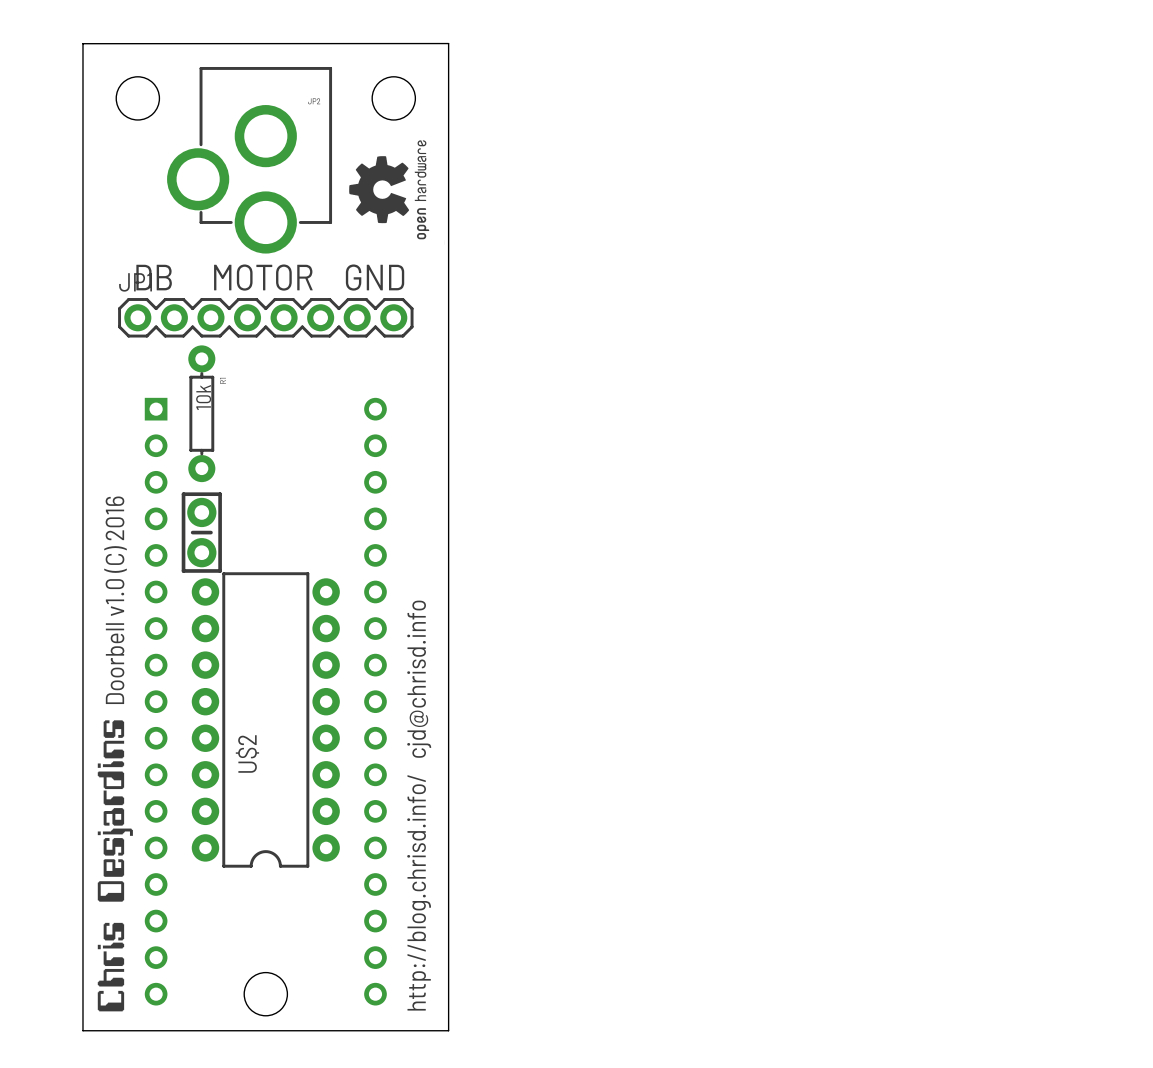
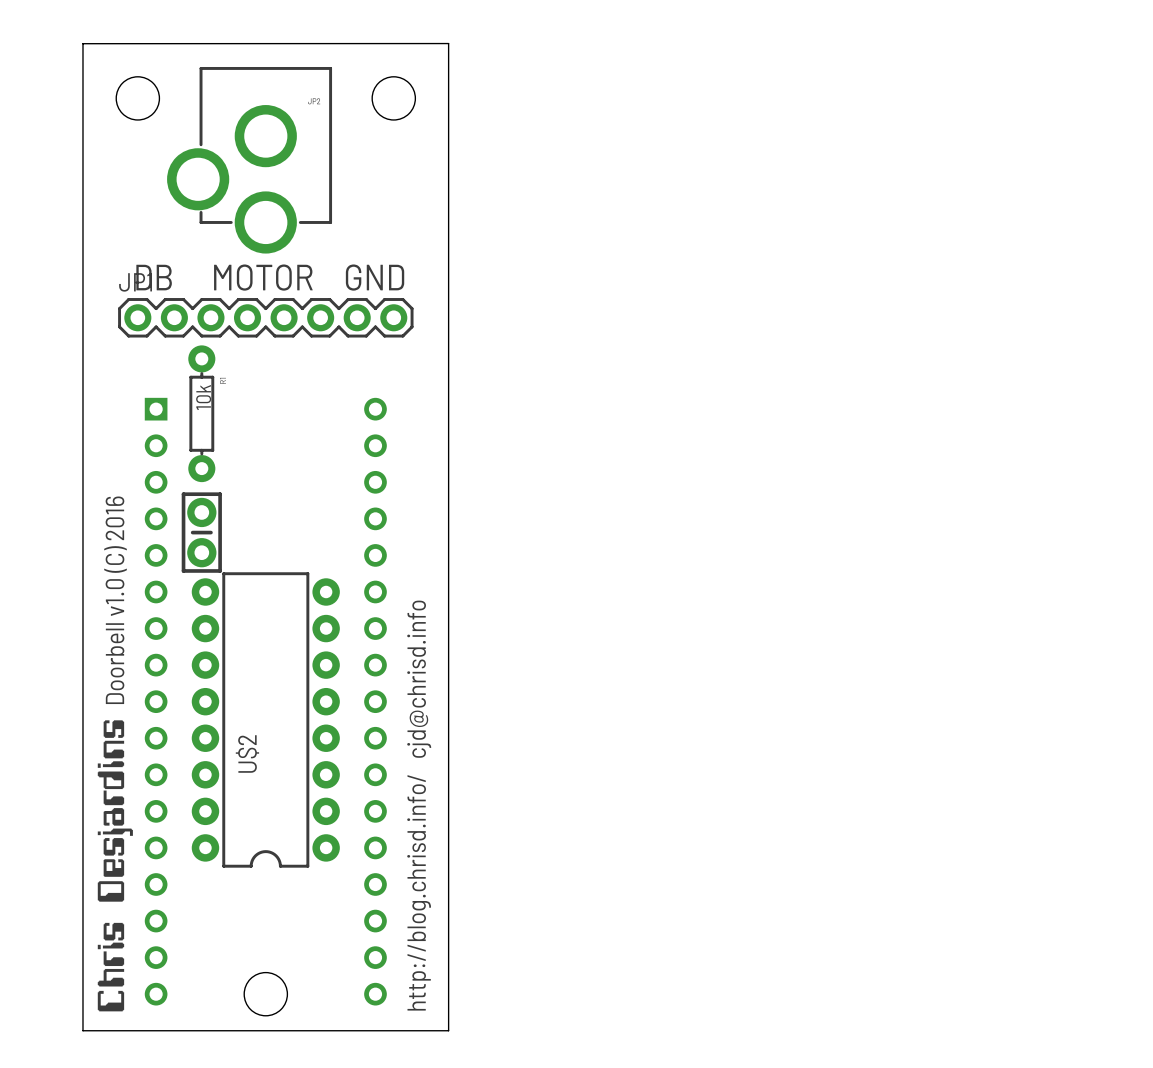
drawing: [349, 140, 430, 240] -> none

